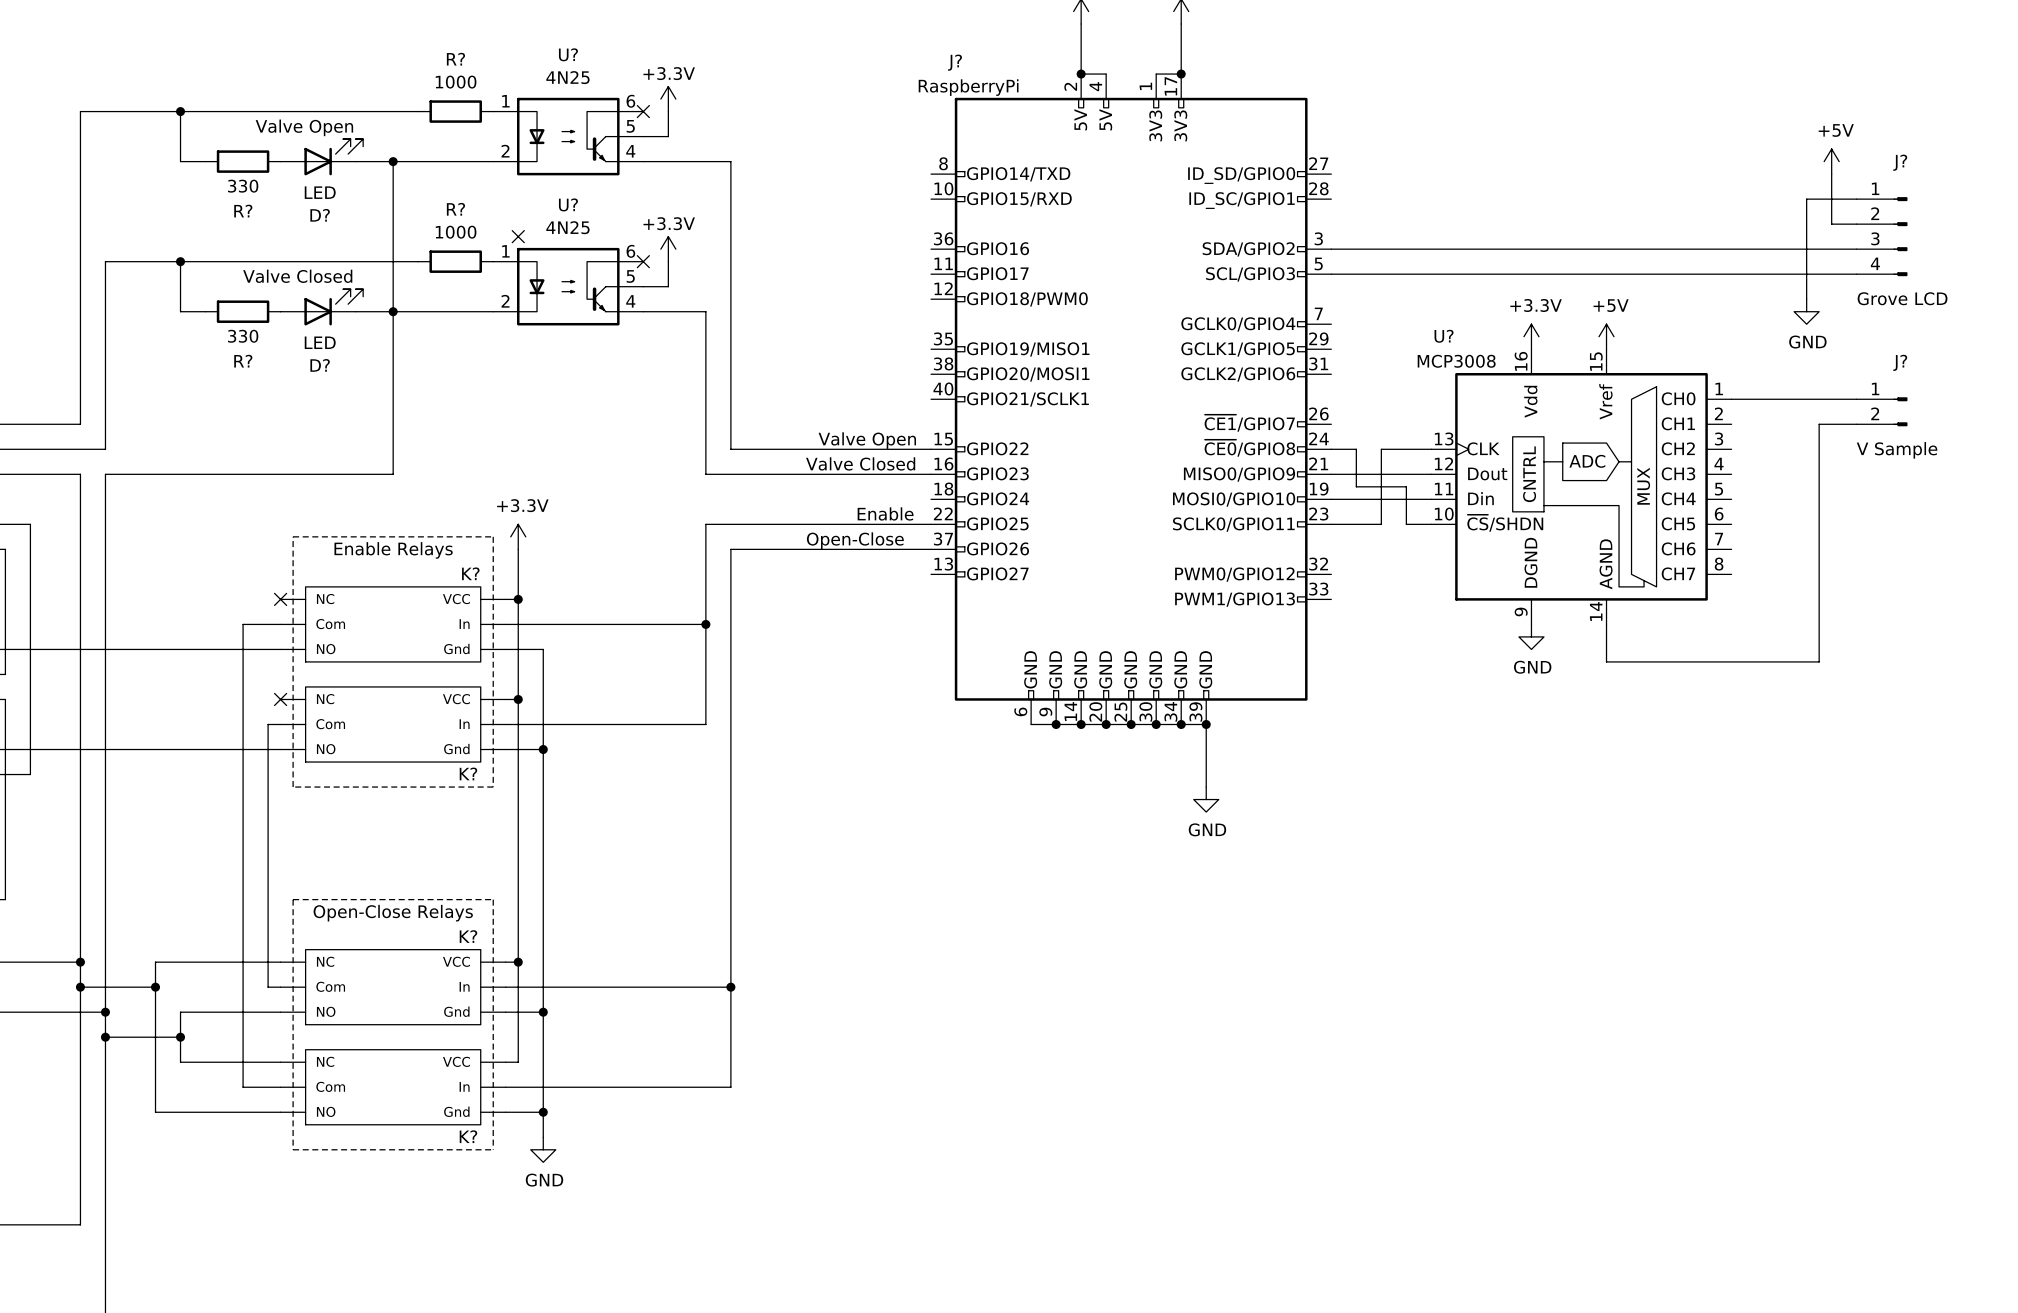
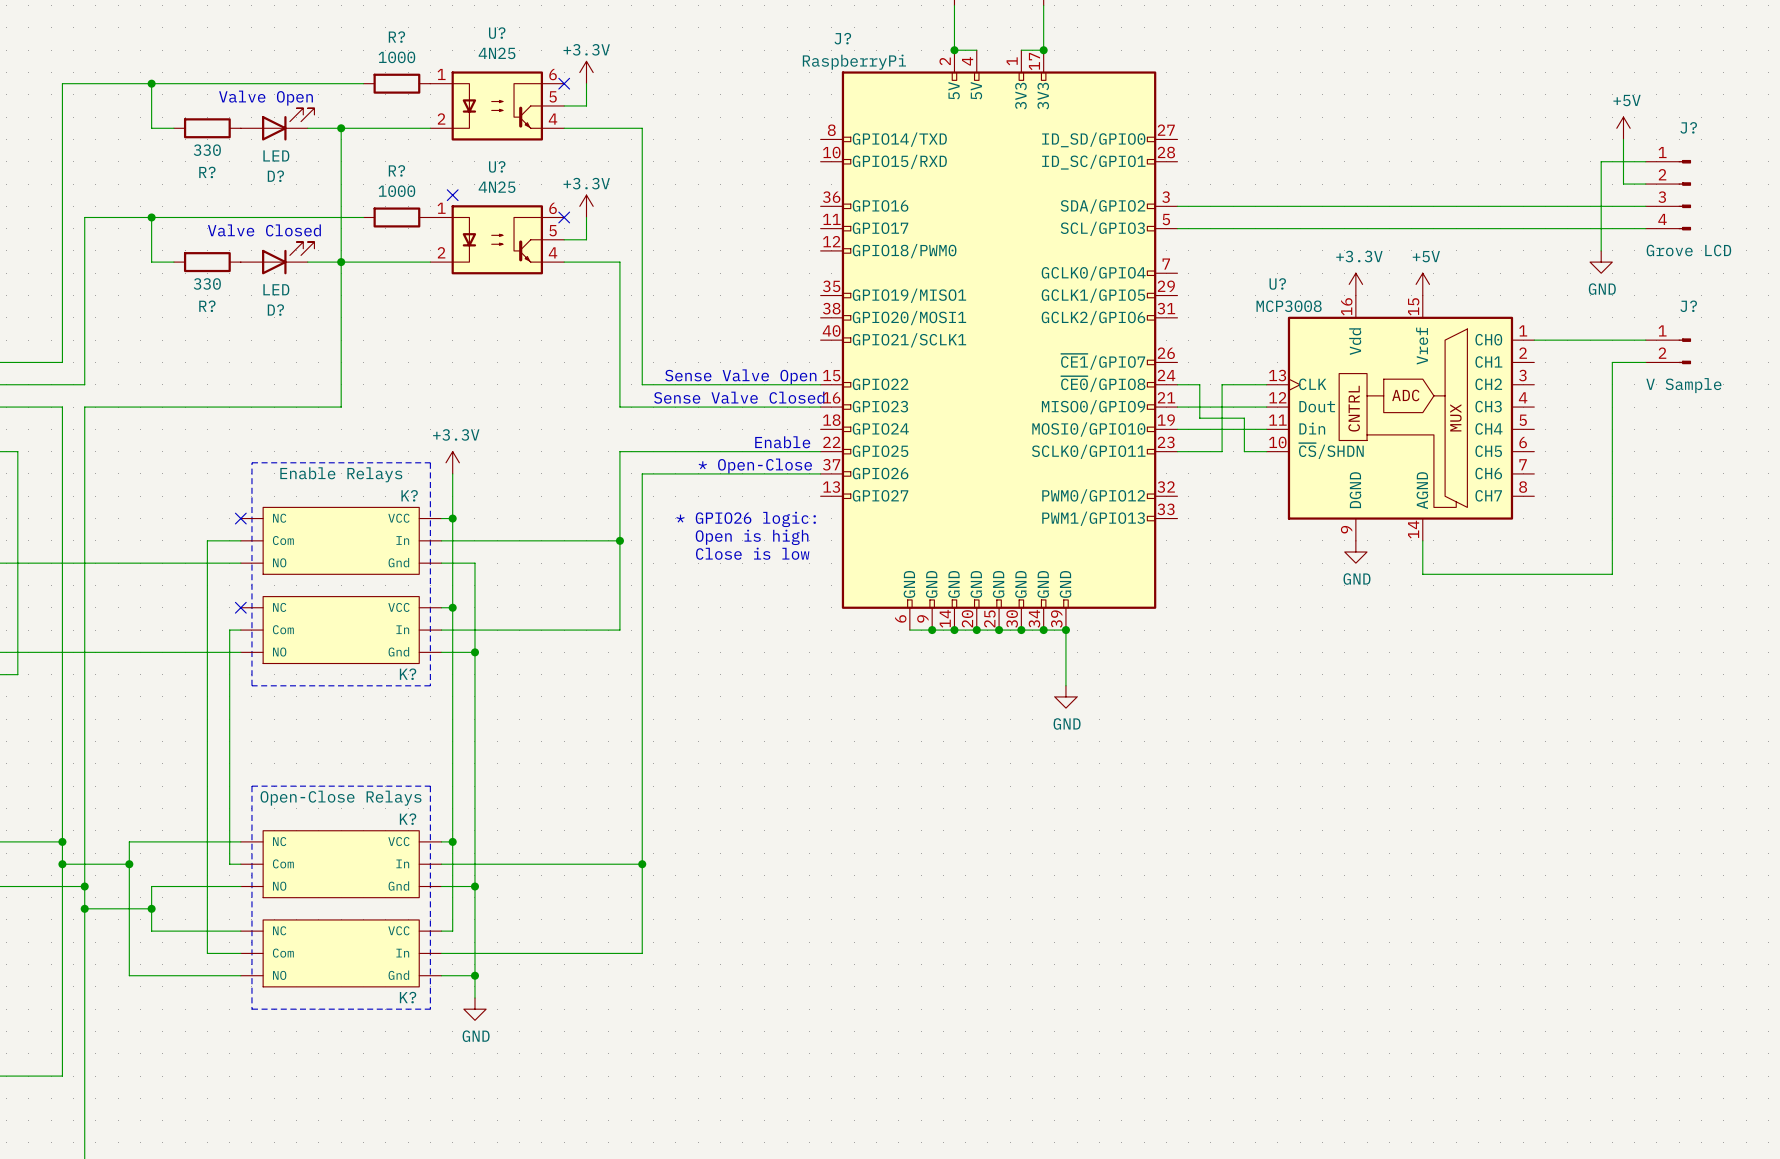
text: Valve Open (867, 440) -> Sense Valve Open (740, 376)
text: Valve Closed (860, 463) -> Sense Valve Closed (739, 397)
text: Open-Close (855, 540) -> * Open-Close (755, 466)
text: none -> * GPIO26 logic: (746, 519)
text: none -> Open is high (752, 537)
text: none -> Close is low (752, 553)

